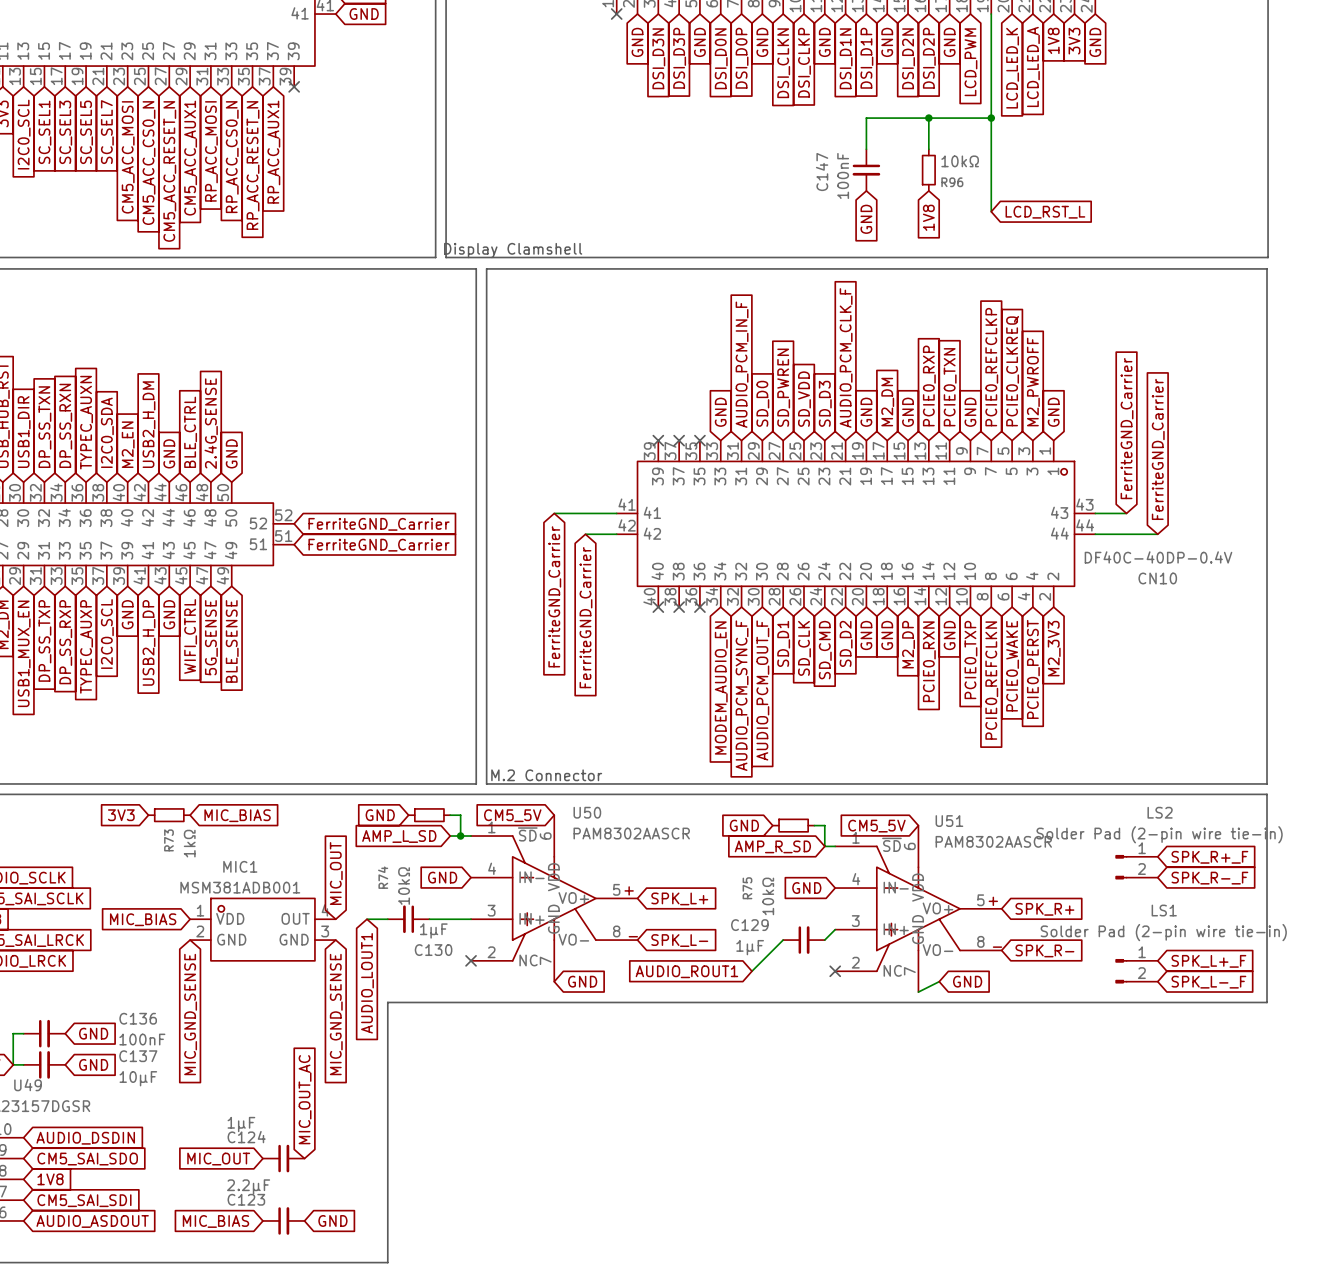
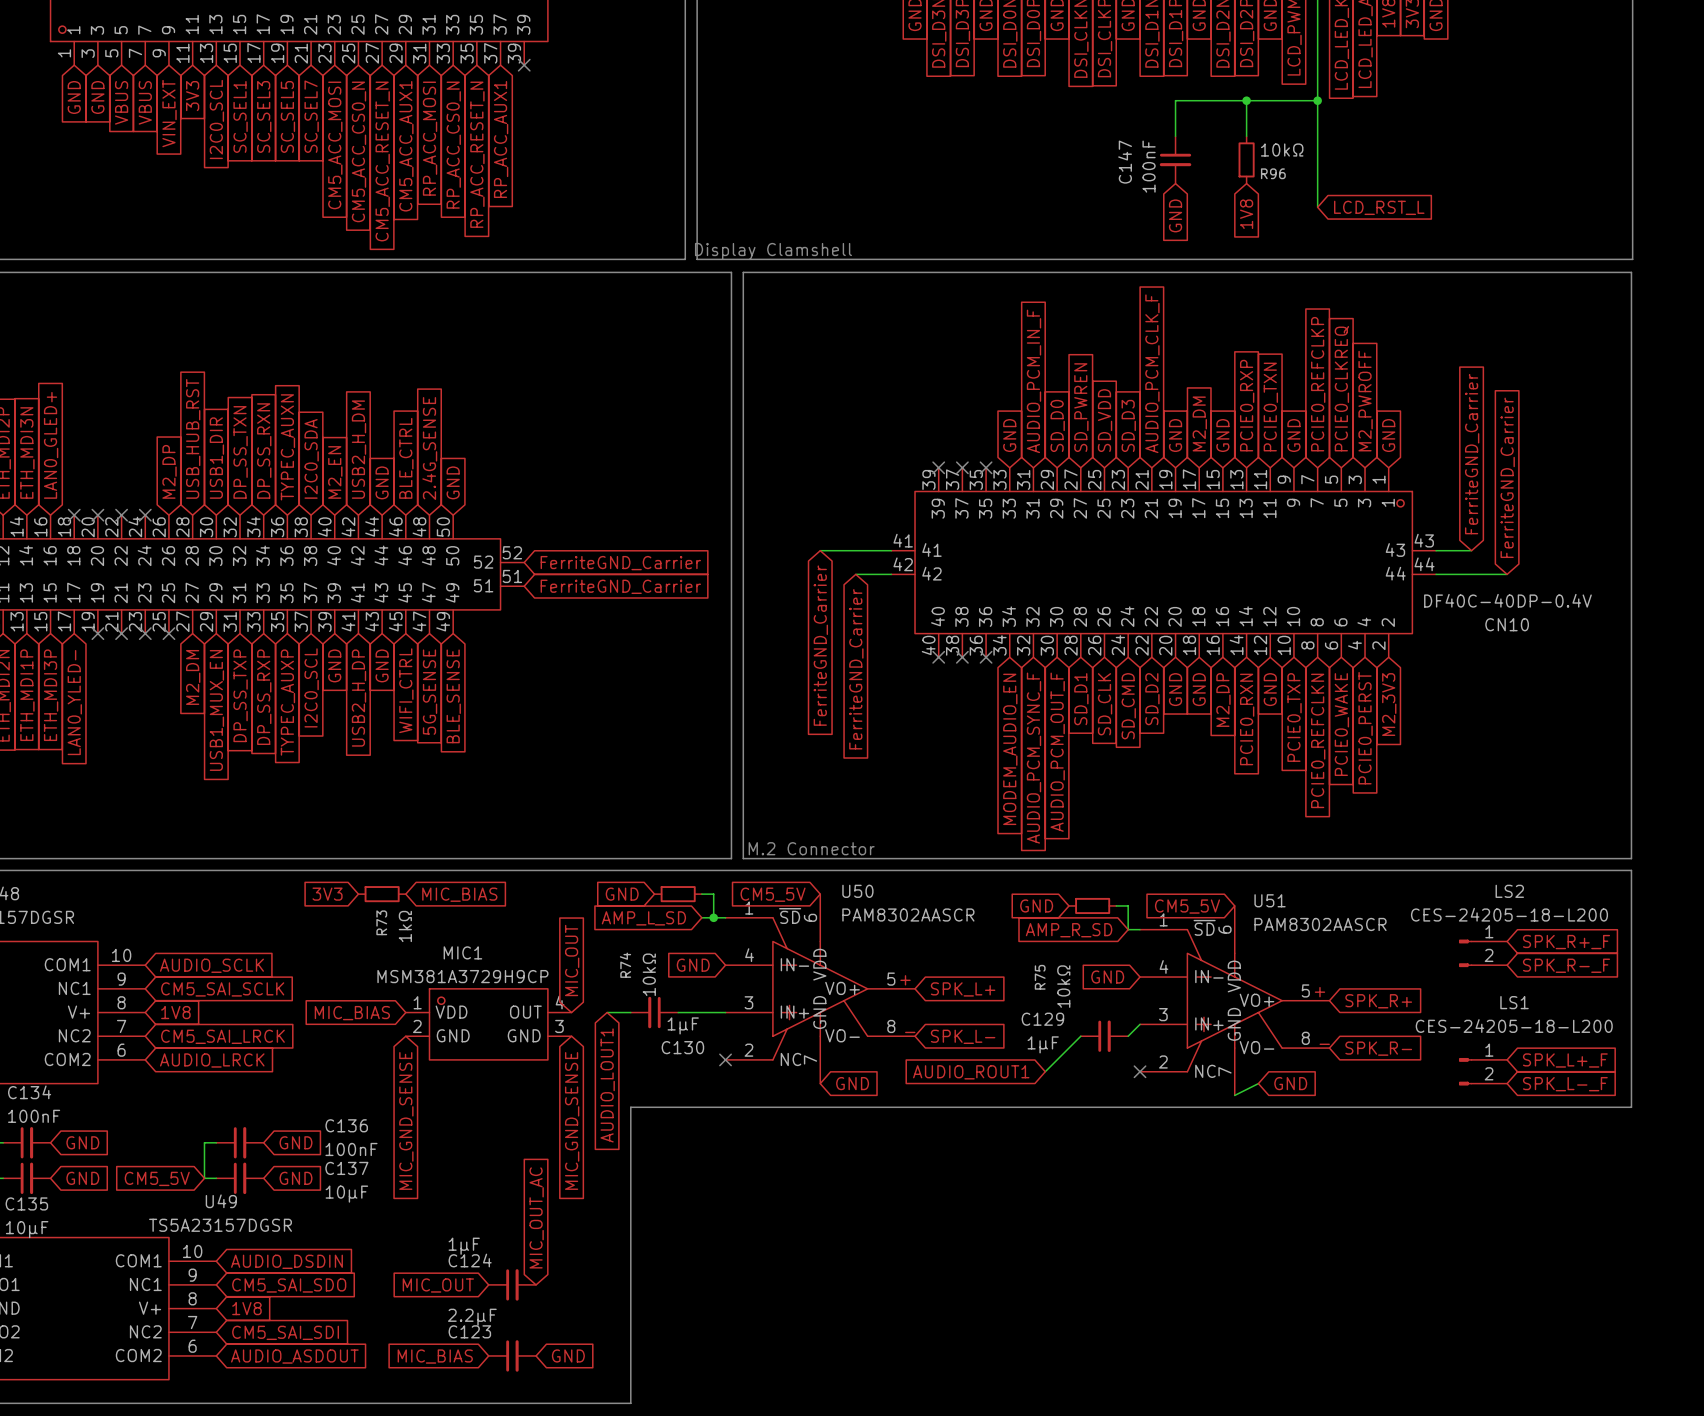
LS2 value: Solder Pad (2-pin wire tie-in) (1159, 834) -> CES-24205-18-L200 (1509, 914)
MIC1 value: MSM381ADB001 (240, 887) -> MSM381A3729H9CP (462, 976)
LS1 value: Solder Pad (2-pin wire tie-in) (1163, 932) -> CES-24205-18-L200 (1514, 1026)

